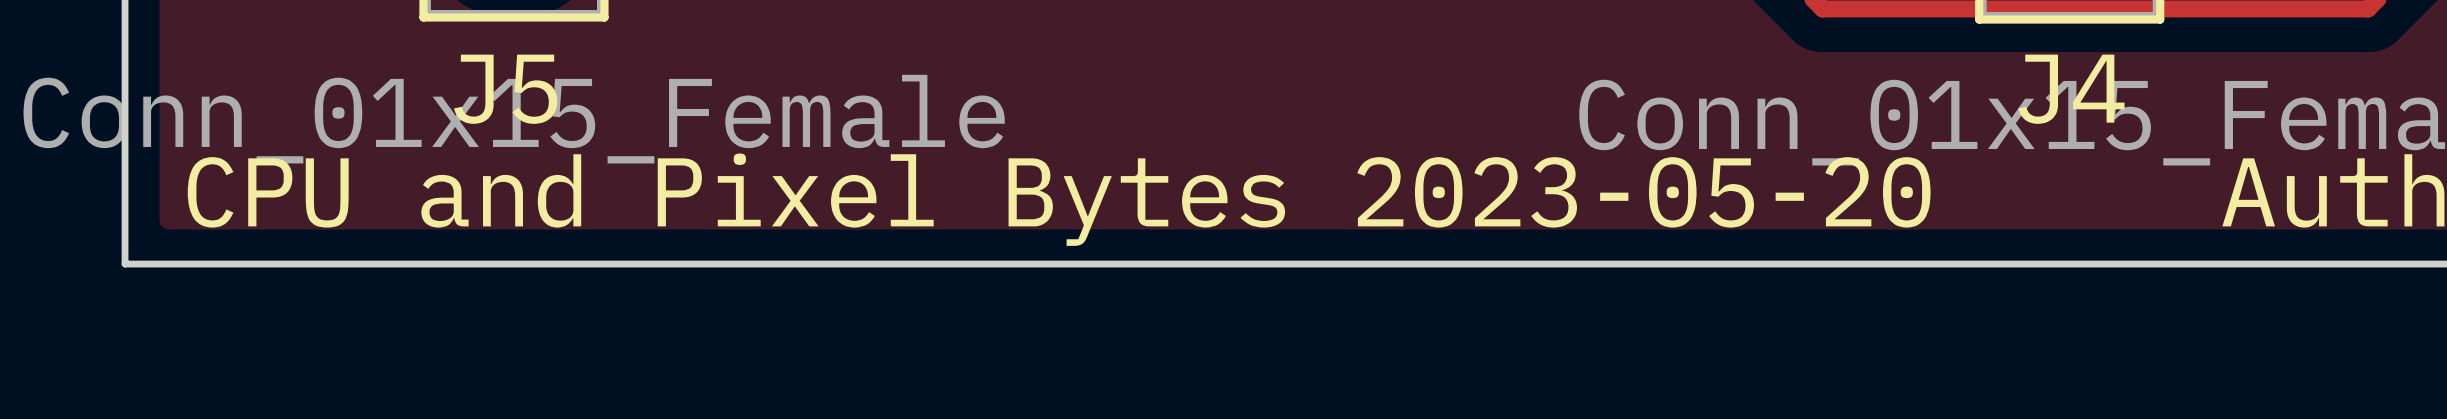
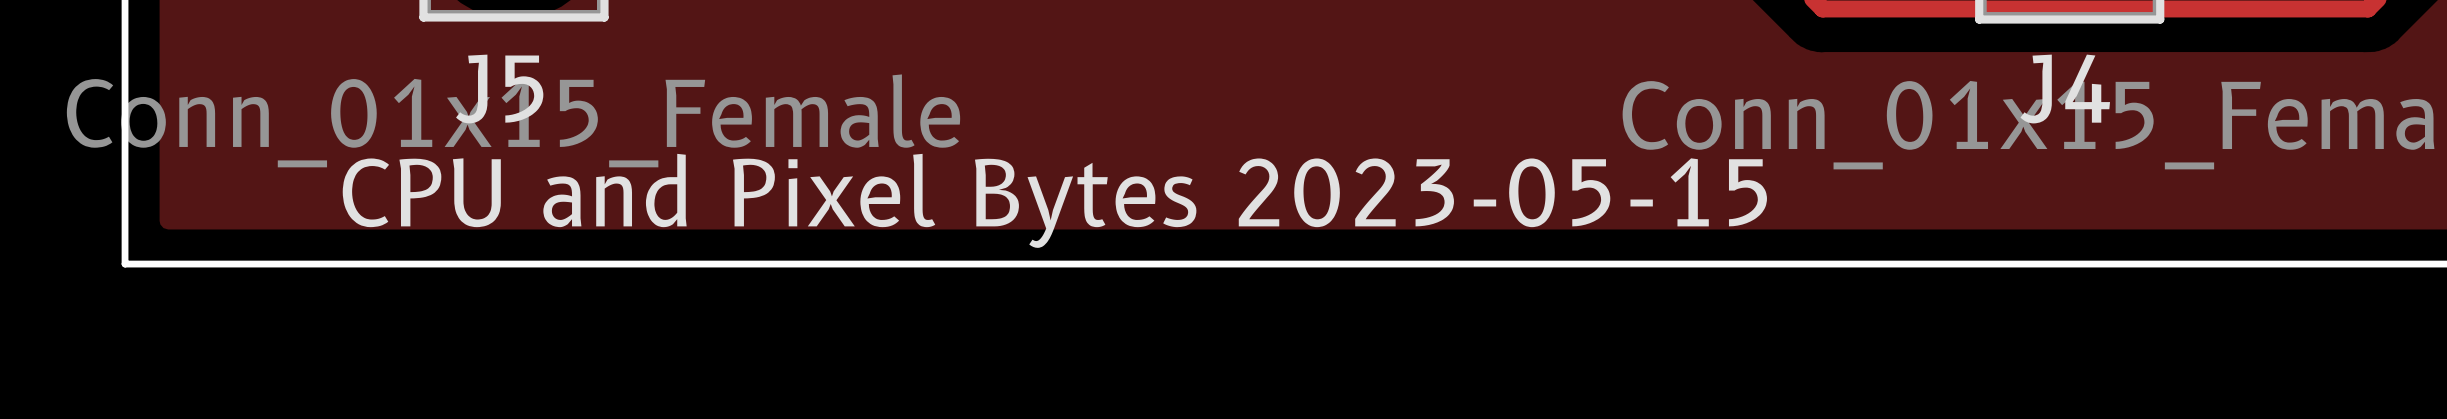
text: CPU and Pixel Bytes 2023-05-20 (1059, 199) -> CPU and Pixel Bytes 2023-05-15 (1054, 200)

